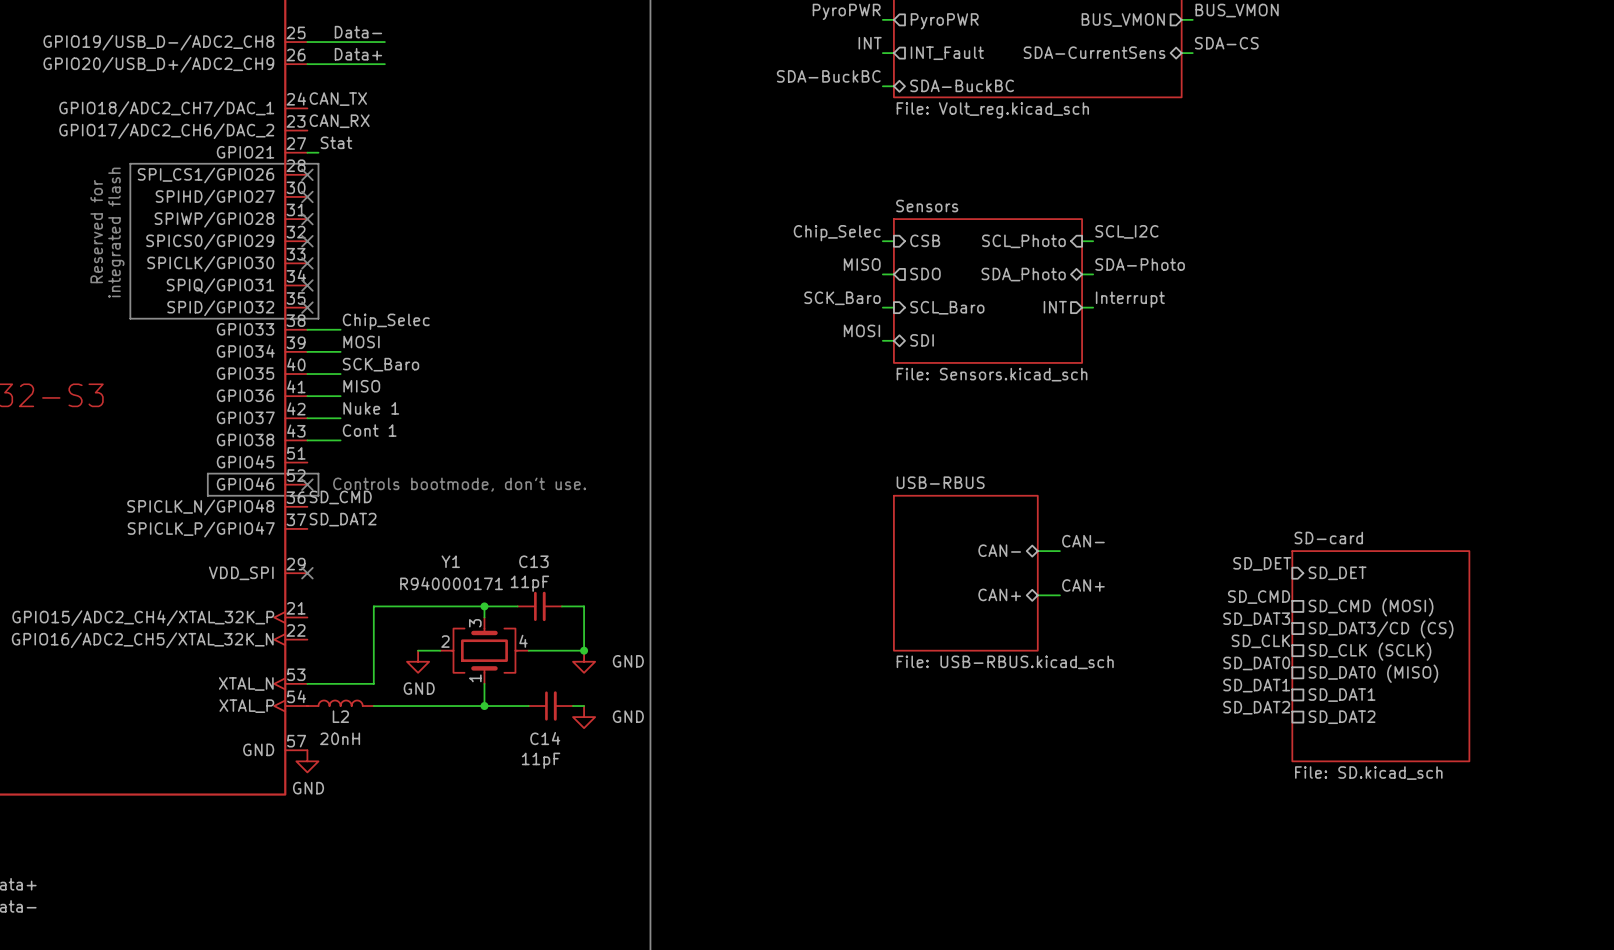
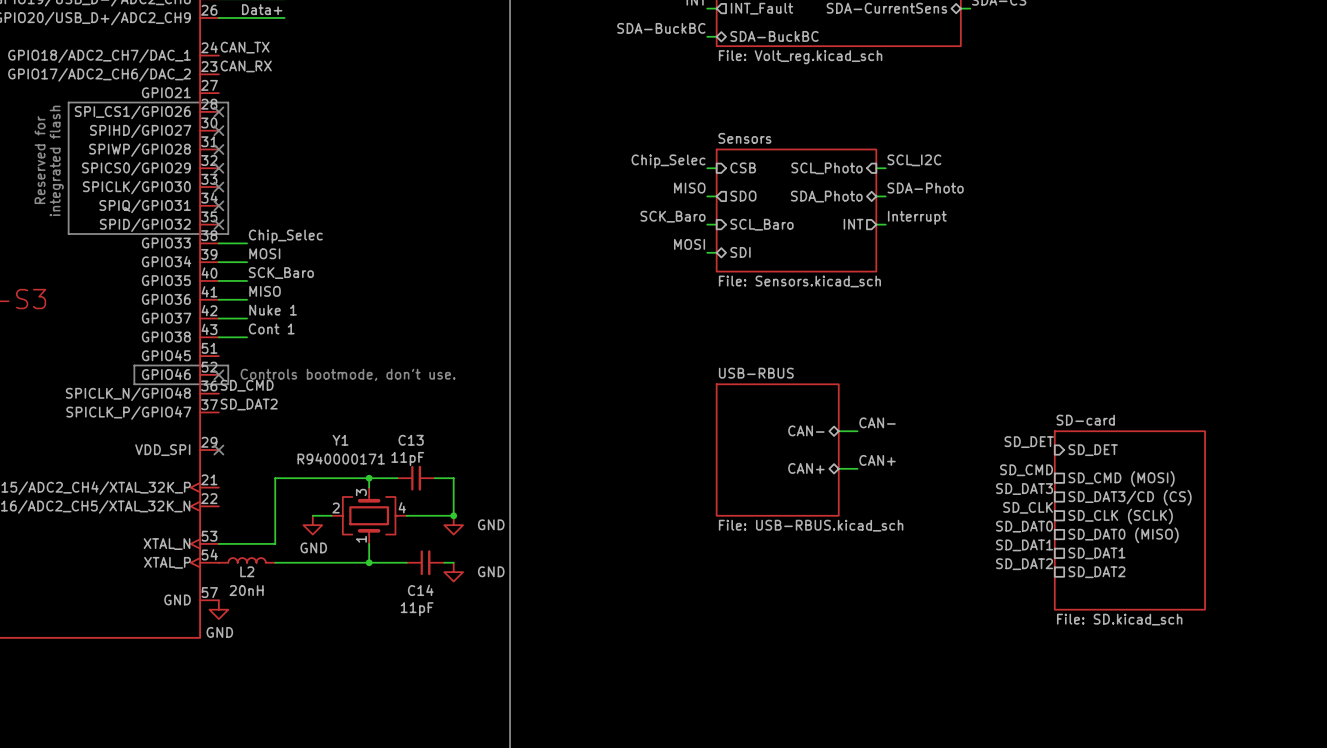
label: Stat (336, 142) -> none
wire: (307, 152) (318, 152) -> none

